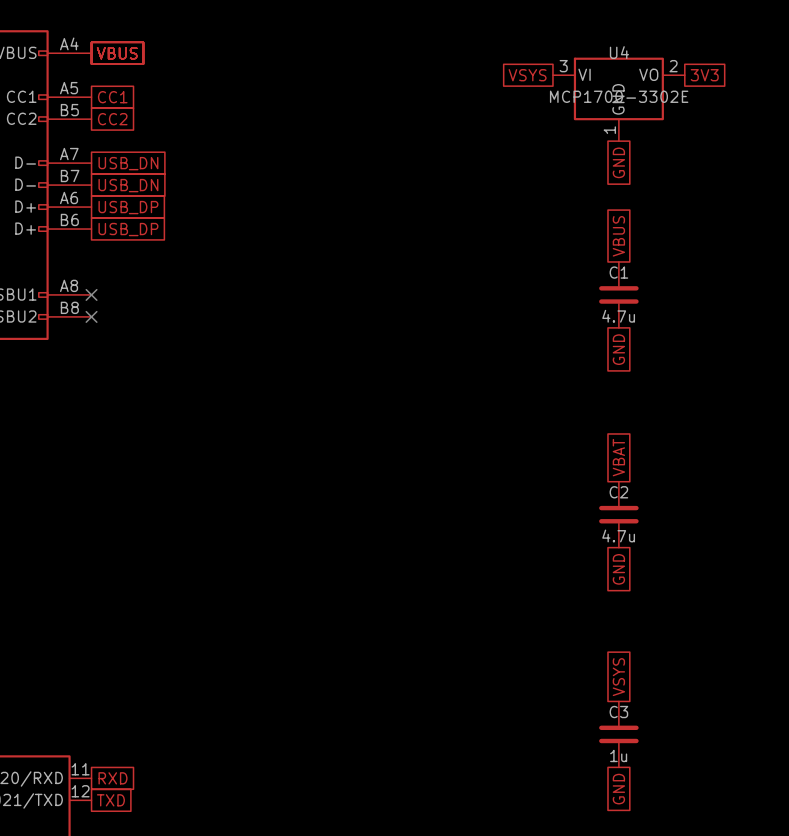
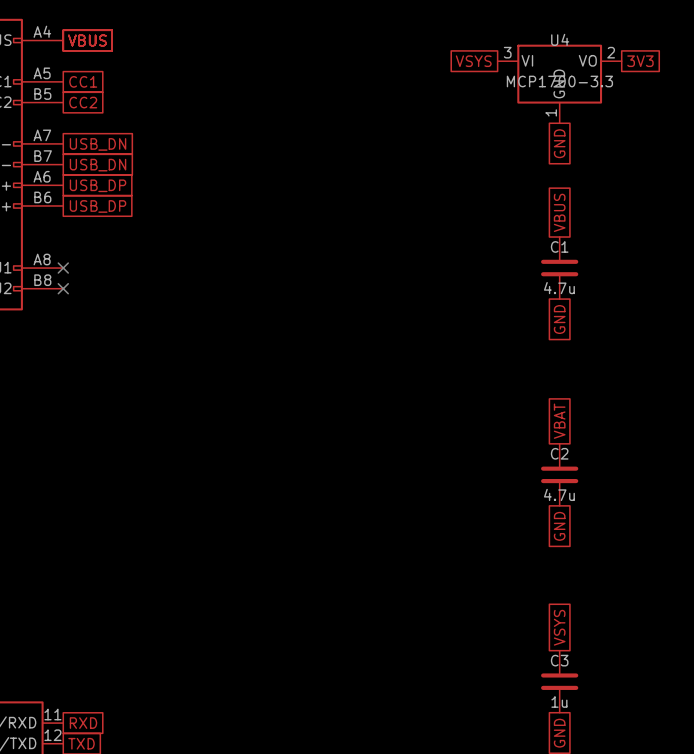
U4 value: MCP1700-3302E (619, 96) -> MCP1700-3.3 (559, 81)

